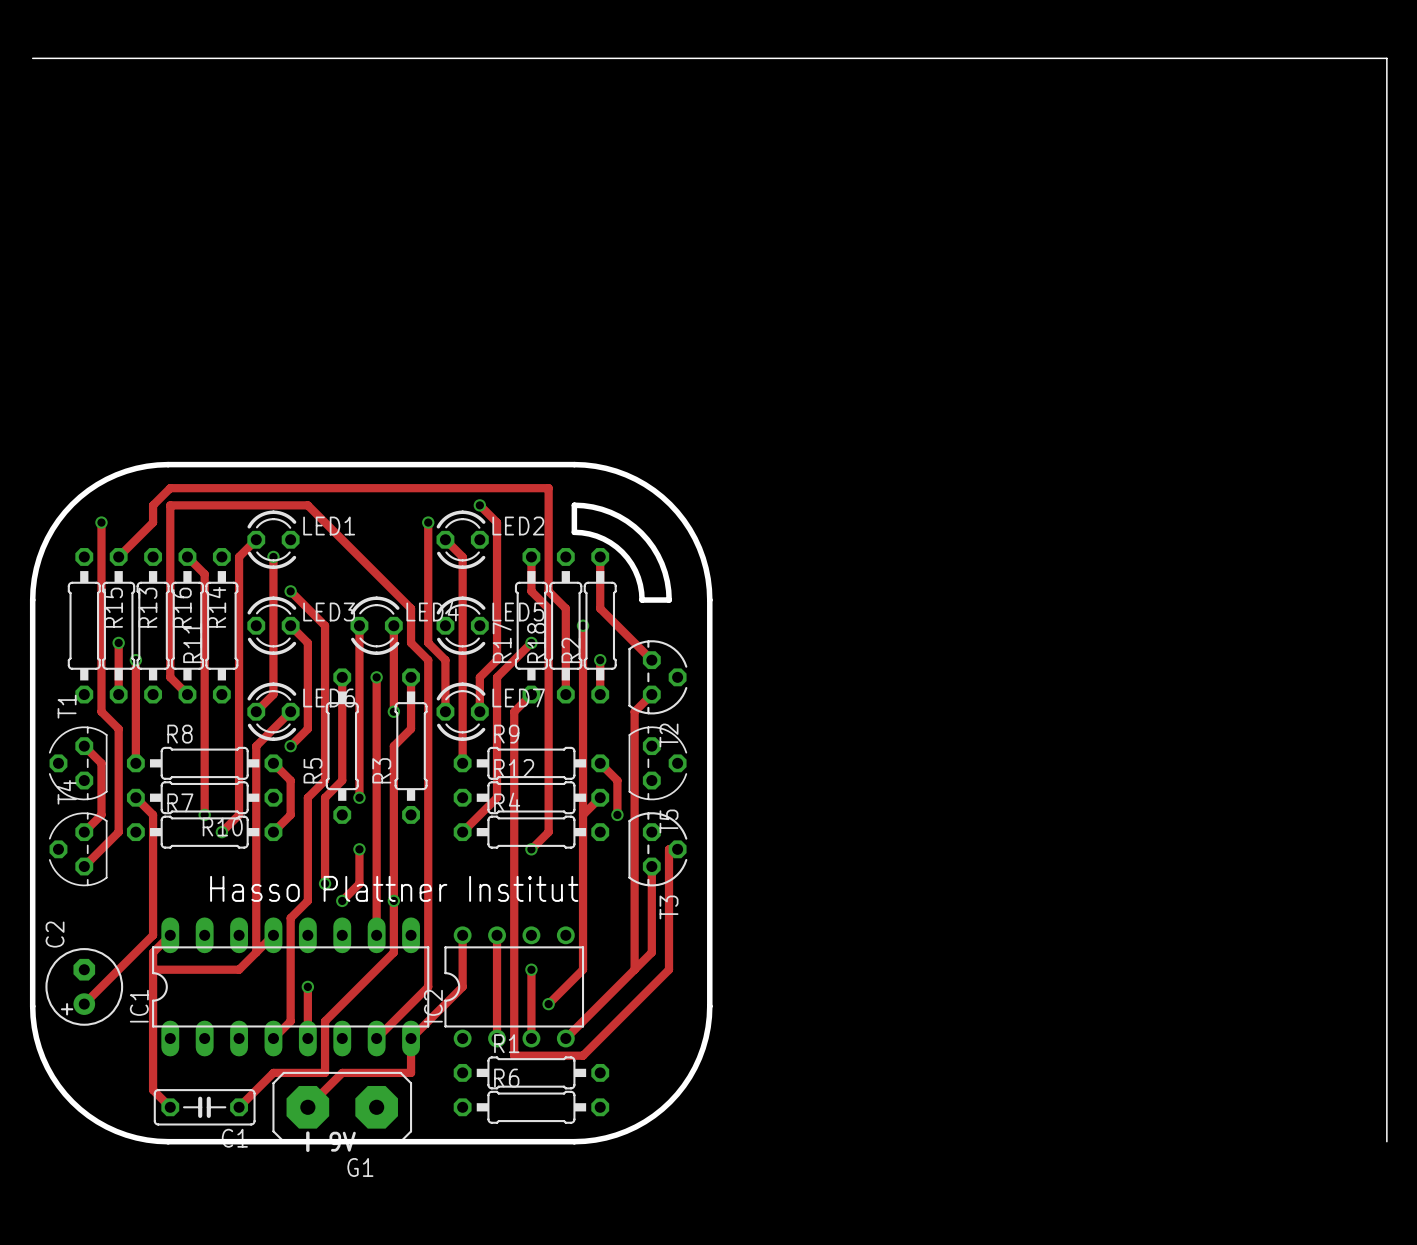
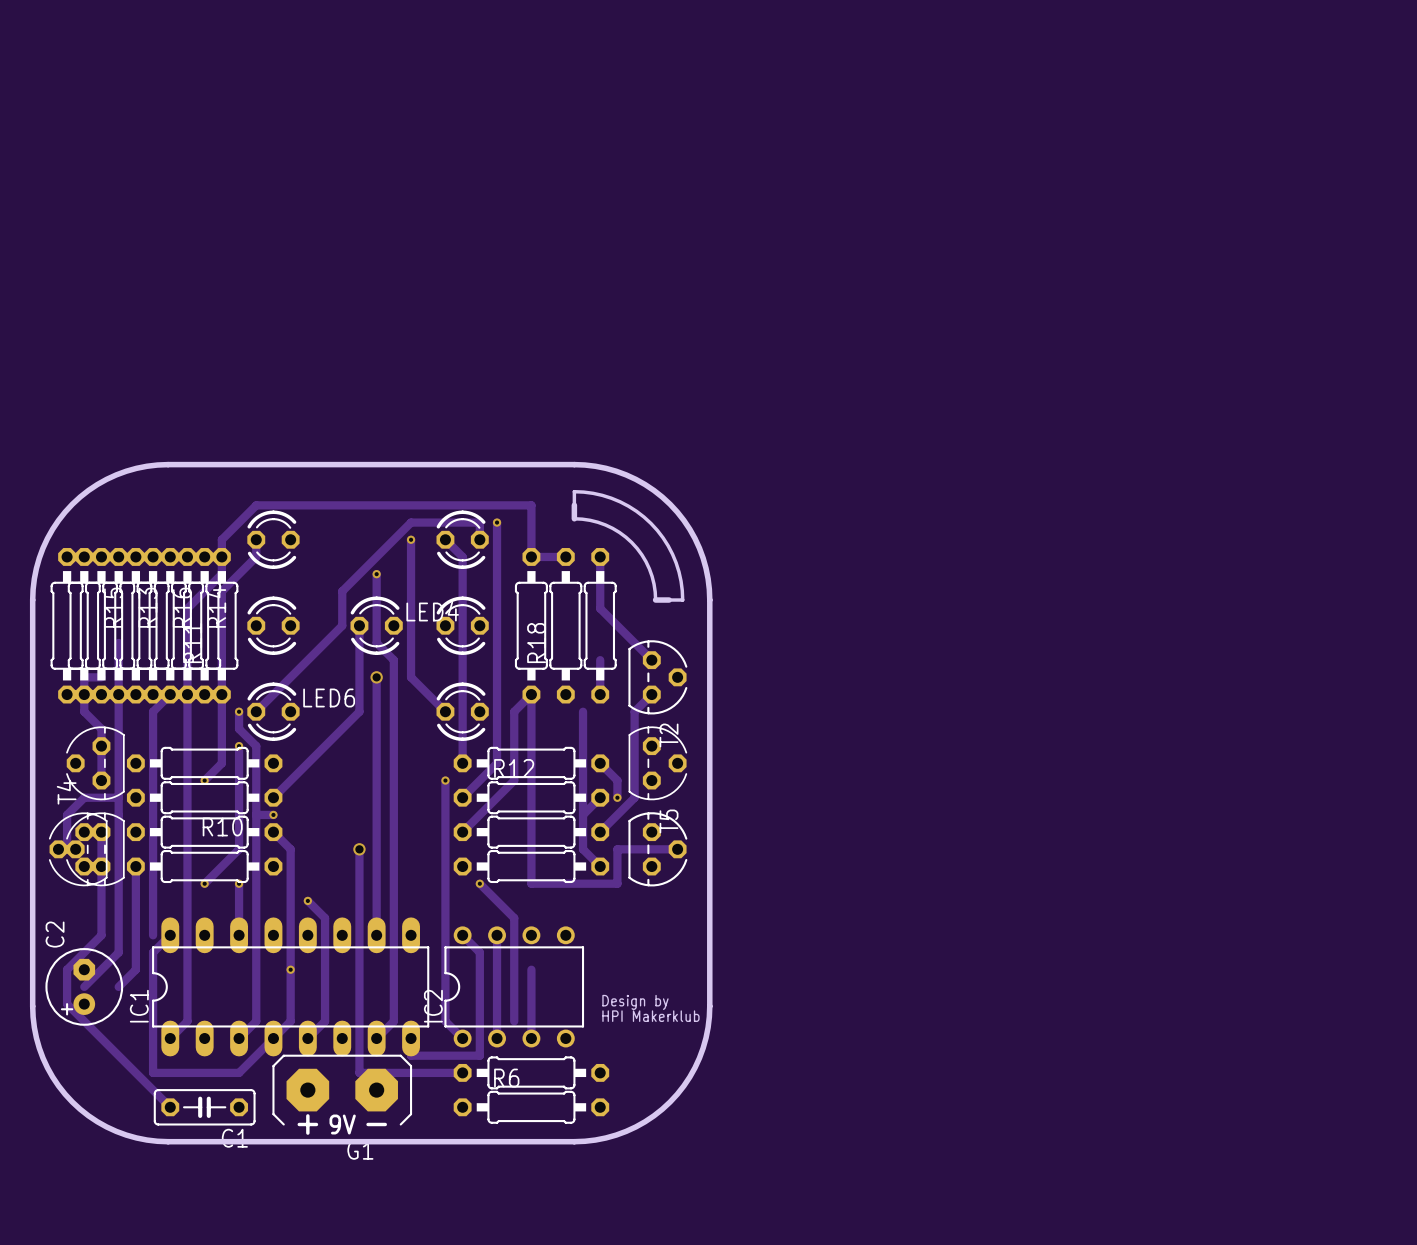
board edge: (32, 58) (1386, 58) (1386, 1141) -> none
track: (256, 505) (170, 505) (170, 677) (187, 694) -> (256, 505) (221, 539) (221, 574) (187, 608) (187, 1021) (170, 1038)
track: (307, 505) (411, 608) -> (411, 539) (411, 608)
track: none -> (307, 505) (531, 505) (531, 556) (565, 556)
track: (479, 505) (497, 522) -> none
via: (479, 505) -> none
board edge: (574, 505) (592, 507) (610, 512) (627, 521) (641, 532) (653, 547) (661, 563) (667, 581) (669, 600) -> (574, 505) (574, 491) (602, 495) (628, 506) (650, 523) (668, 545) (679, 571) (682, 600) (669, 600)
board edge: (574, 518) (574, 532) (596, 536) (610, 542) (622, 552) (631, 564) (638, 577) (642, 600) (655, 600) -> (574, 518) (590, 520) (605, 524) (619, 532) (631, 542) (641, 554) (649, 568) (654, 584) (655, 600)
track: (101, 522) (101, 711) (118, 728) -> (118, 694) (118, 728)
via: (101, 522) -> none
track: (428, 522) (428, 642) (445, 660) (445, 711) -> (411, 642) (411, 677) (445, 711)
via: (428, 522) -> none
via: none -> (497, 522)
LED1 name: LED1 (329, 526) -> none
LED2 name: LED2 (518, 526) -> none
track: (256, 539) (239, 556) (239, 711) -> (256, 539) (256, 556) (221, 591) (221, 763) (204, 780)
via: none -> (411, 539)
track: (118, 556) (153, 522) (153, 505) (170, 488) (548, 488) (548, 591) (565, 608) (565, 694) -> none
track: (187, 556) (204, 574) (204, 814) -> none
track: (273, 556) (273, 694) -> (479, 539) (479, 522) (411, 522) (342, 591) (342, 625) (273, 694)
via: (273, 556) -> none
track: (531, 556) (531, 591) (548, 608) (548, 832) (531, 849) -> none
via: none -> (376, 574)
track: (290, 591) (325, 625) (325, 780) (307, 797) (307, 900) (290, 918) -> none
via: (290, 591) -> none
LED3 name: LED3 (329, 611) -> none
LED5 name: LED5 (518, 611) -> none
part: none -> (67, 625)
part: none -> (101, 625)
part: none -> (135, 625)
part: none -> (170, 625)
part: none -> (204, 625)
track: (290, 625) (307, 642) (307, 728) (290, 746) -> none
track: (393, 625) (393, 660) -> (376, 574) (376, 642) (393, 660)
track: (583, 625) (583, 711) -> none
via: (583, 625) -> none
via: (118, 642) -> none
track: (411, 642) (428, 660) (428, 986) (393, 1021) -> none
R17 name: R17 (502, 642) -> none
track: (531, 642) (497, 677) -> (497, 660) (497, 677)
via: (531, 642) -> none
R2 name: R2 (570, 650) -> none
track: (135, 660) (135, 763) -> none
via: (135, 660) -> none
track: (497, 660) (479, 677) (479, 711) -> none
via: (600, 660) -> none
track: (342, 677) (342, 780) (325, 797) (325, 883) -> none
track: (411, 677) (411, 728) (393, 746) -> (393, 711) (393, 746)
LED7 name: LED7 (518, 697) -> none
via: none -> (239, 711)
track: (290, 711) (256, 746) -> (497, 763) (462, 797)
track: (359, 711) (359, 797) -> (359, 711) (273, 797)
via: (393, 711) -> none
track: (239, 728) (239, 746) -> (239, 728) (256, 746)
R8 name: R8 (180, 734) -> none
R9 name: R9 (506, 734) -> none
track: (84, 746) (101, 763) -> (101, 677) (84, 677) (84, 711) (101, 728) (101, 763)
via: none -> (239, 746)
via: (290, 746) -> none
R5: (342, 746) -> none
R3: (411, 746) -> none
T1: (78, 763) -> none
part: none -> (95, 763)
track: (273, 763) (290, 780) (290, 814) (273, 832) -> (290, 918) (290, 849) (273, 832)
track: (497, 763) (497, 797) -> (514, 780) (497, 797)
track: (101, 780) (101, 814) (84, 832) -> none
via: none -> (204, 780)
track: none -> (445, 780) (445, 1021) (462, 1038)
via: none -> (445, 780)
track: (514, 780) (514, 918) -> (479, 883) (514, 918)
track: none -> (118, 797) (84, 797) (67, 814) (67, 849) (75, 849)
track: (135, 797) (153, 814) -> (170, 694) (153, 711) (153, 814)
via: (359, 797) -> none
track: (617, 797) (617, 814) -> none
via: none -> (617, 797)
track: (634, 797) (634, 969) -> (634, 797) (600, 832)
R7 name: R7 (180, 802) -> none
R4 name: R4 (507, 802) -> none
via: (204, 814) -> none
track: (239, 814) (221, 832) -> (239, 814) (239, 849) (204, 883)
track: none -> (256, 814) (273, 814)
via: none -> (273, 814)
via: (617, 814) -> none
track: none -> (101, 832) (101, 935) (67, 969) (67, 1004) (153, 1090)
track: (118, 832) (84, 866) -> (118, 832) (118, 952) (84, 986)
via: (221, 832) -> none
part: none -> (95, 849)
via: (531, 849) -> none
track: (583, 849) (583, 969) (548, 1004) -> (583, 849) (600, 866)
track: (669, 849) (669, 969) (583, 1055) (514, 1055) (514, 1021) -> (669, 849) (617, 849) (617, 883) (531, 883) (531, 694)
track: none -> (135, 866) (135, 969) (118, 986)
part: none -> (204, 866)
part: none -> (531, 866)
track: (651, 866) (651, 952) (565, 1038) -> none
via: none -> (204, 883)
track: none -> (239, 883) (239, 935)
via: none -> (239, 883)
via: (325, 883) -> none
track: (359, 883) (342, 900) -> (359, 883) (359, 1072)
via: none -> (479, 883)
text: Hasso Plattner Institut (394, 888) -> none
via: none -> (307, 900)
via: (342, 900) -> none
via: (393, 900) -> none
T3 name: T3 (669, 907) -> none
track: (153, 935) (84, 1004) -> none
track: (273, 935) (239, 969) (153, 969) -> none
track: (462, 935) (462, 986) (411, 1038) -> (462, 935) (479, 952) (479, 1055) (411, 1055)
track: none -> (256, 952) (256, 1021) (239, 1038)
track: (393, 952) (325, 1021) (325, 1072) (273, 1072) (239, 1107) -> (393, 952) (393, 1021)
via: none -> (290, 969)
via: (531, 969) -> none
track: (307, 986) (307, 1038) -> (307, 900) (325, 918) (325, 1021) (307, 1038)
via: (307, 986) -> none
text: none -> Design by (635, 1002)
via: (548, 1004) -> none
text: none -> HPI Makerklub (650, 1016)
R1 name: R1 (506, 1043) -> none
track: (411, 1055) (411, 1072) -> (462, 1072) (411, 1072)
track: (153, 1072) (153, 1090) -> (153, 1072) (239, 1072) (273, 1038)
track: (359, 1072) (342, 1072) (307, 1107) -> none
G1 position: (342, 1111) -> (342, 1094)

